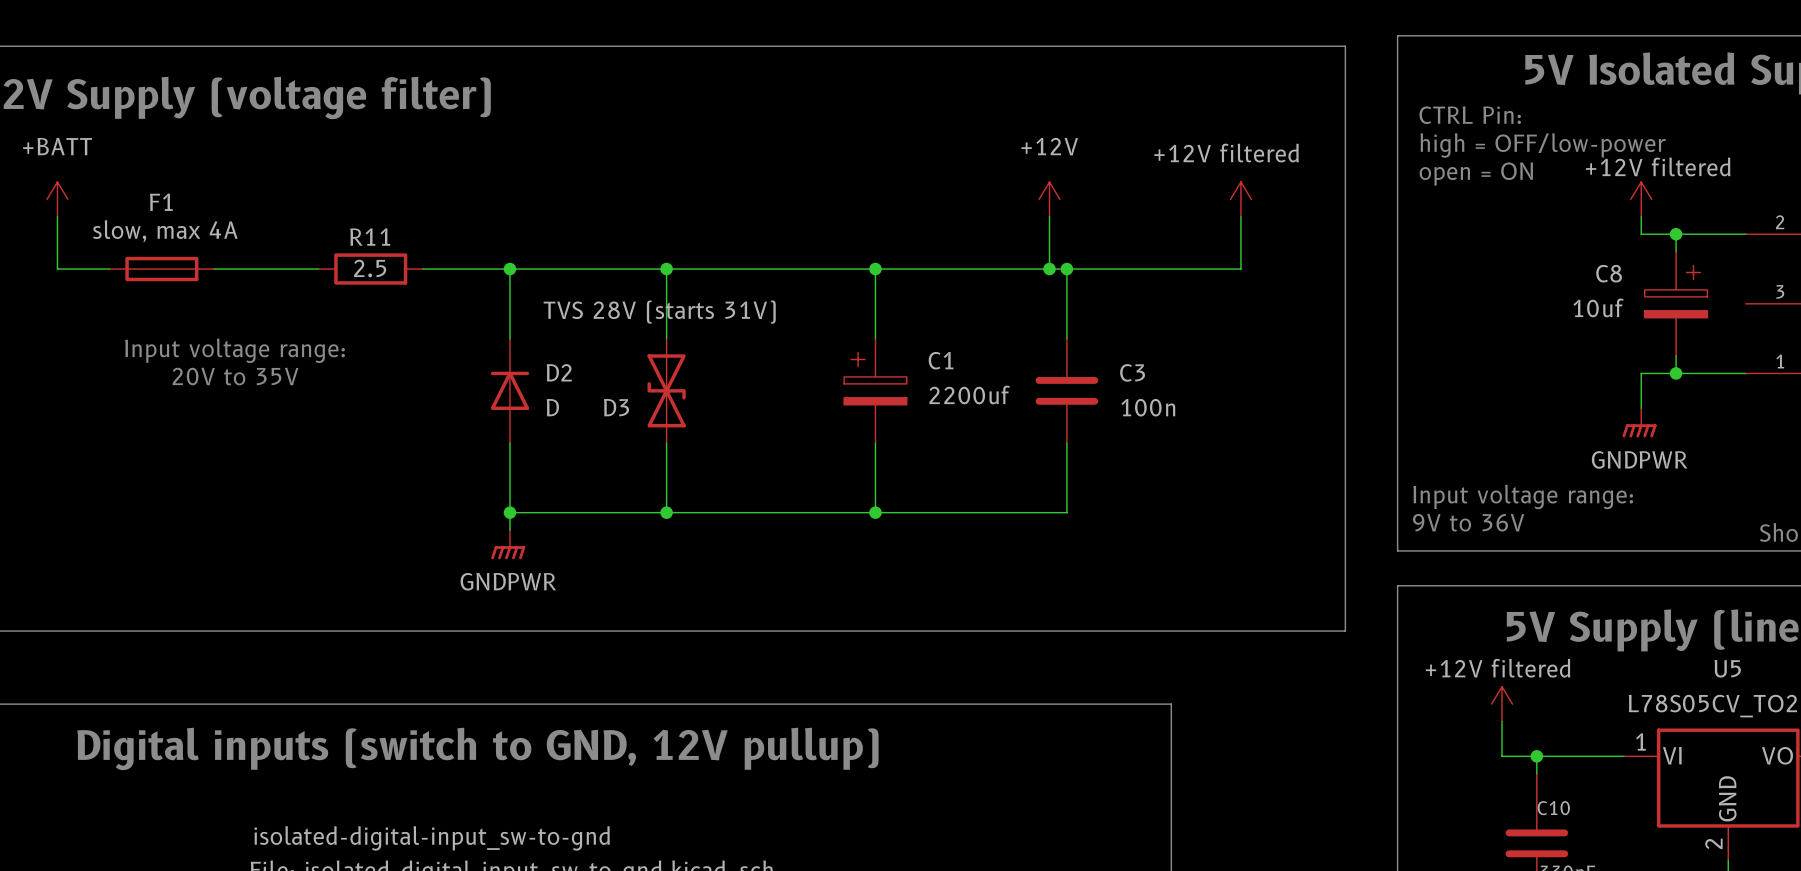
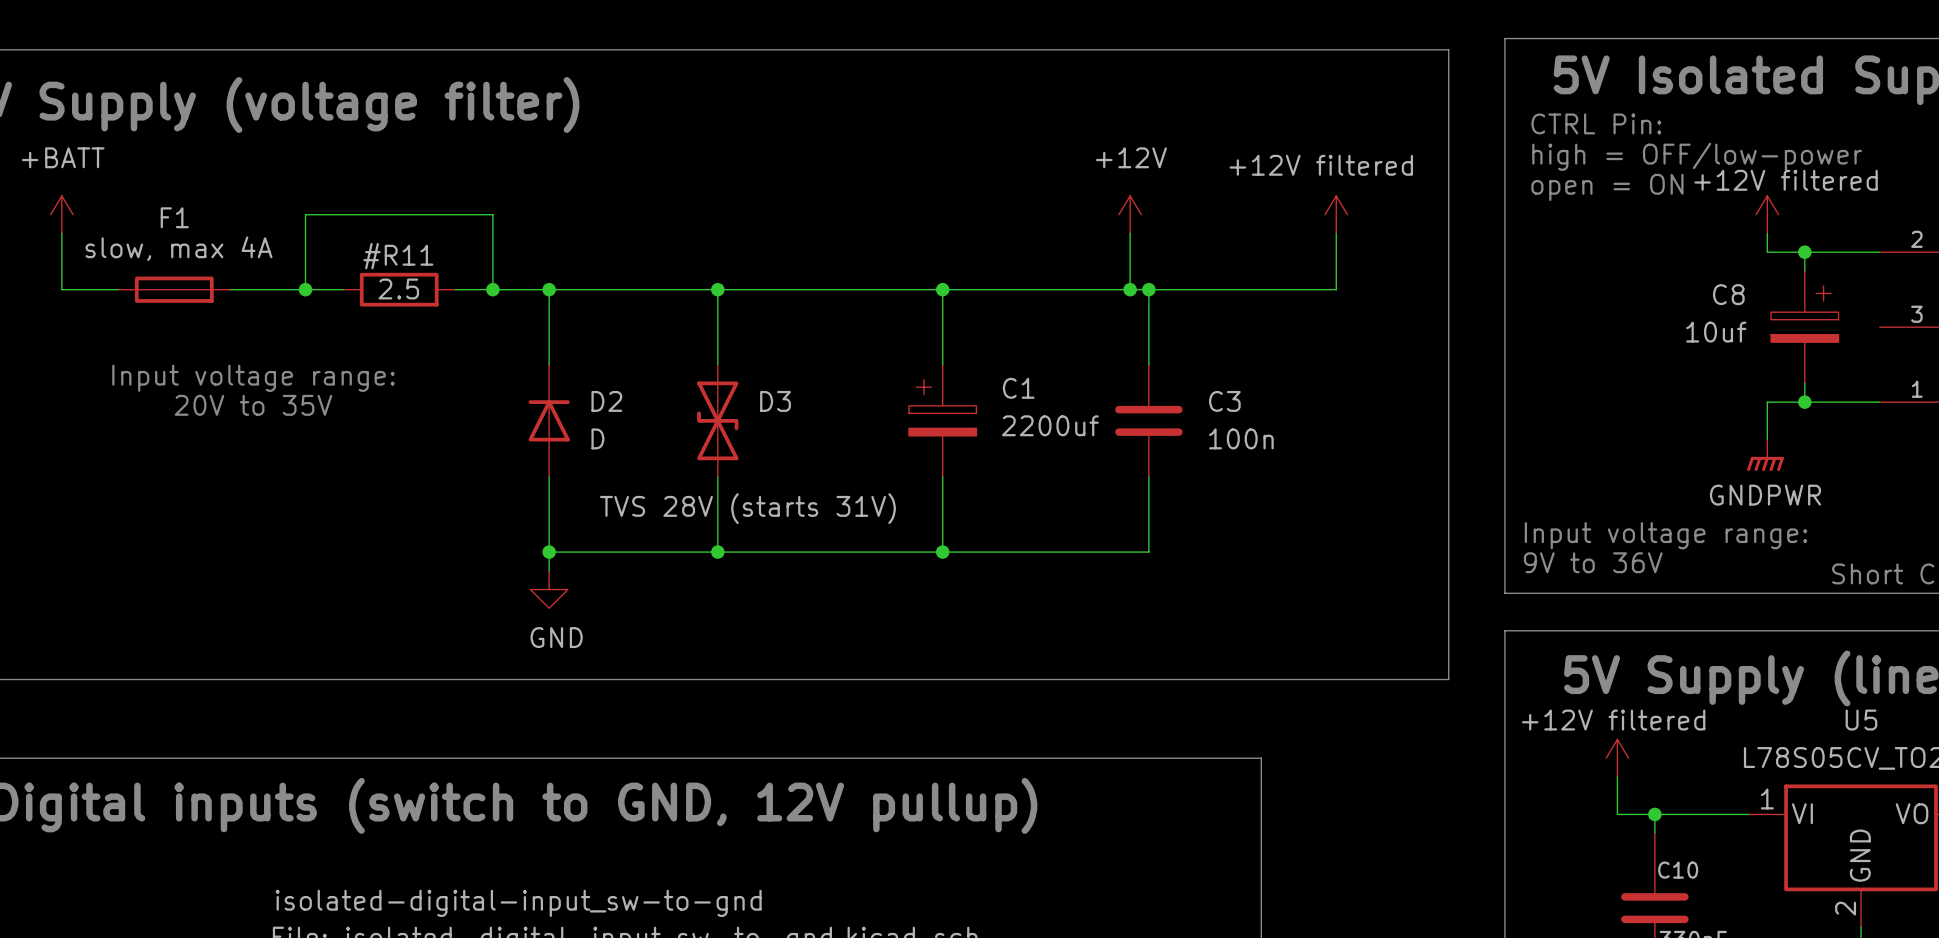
wire: none -> (305, 289) (305, 214) (492, 214) (492, 289)
junction: none -> (305, 289)
R11: 2.5 (370, 269) -> none
#R11: none -> 2.5 (399, 289)
junction: none -> (492, 289)
D3 value position: TVS 28V (starts 31V) (659, 312) -> TVS 28V (starts 31V) (747, 508)
D3 name position: D3 (616, 407) -> D3 (775, 401)
power symbol: GNDPWR (508, 544) -> GND (549, 589)

